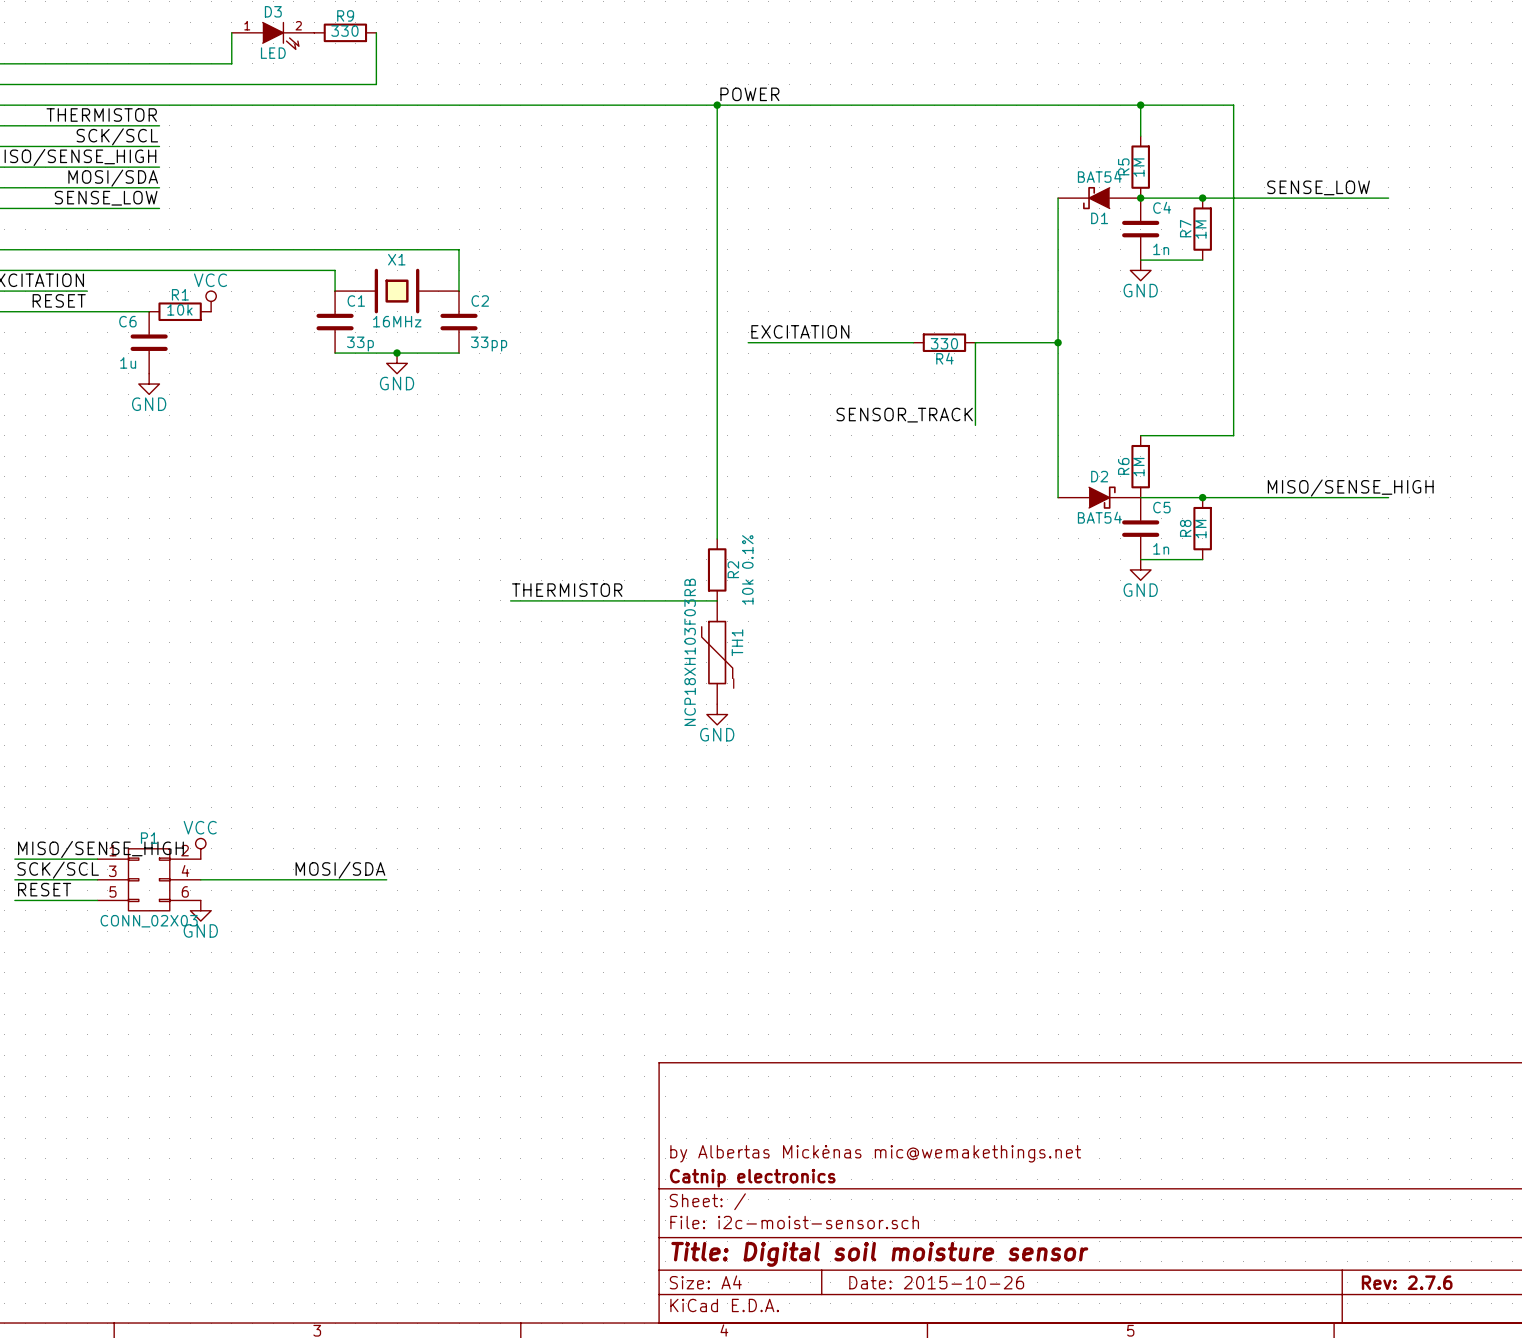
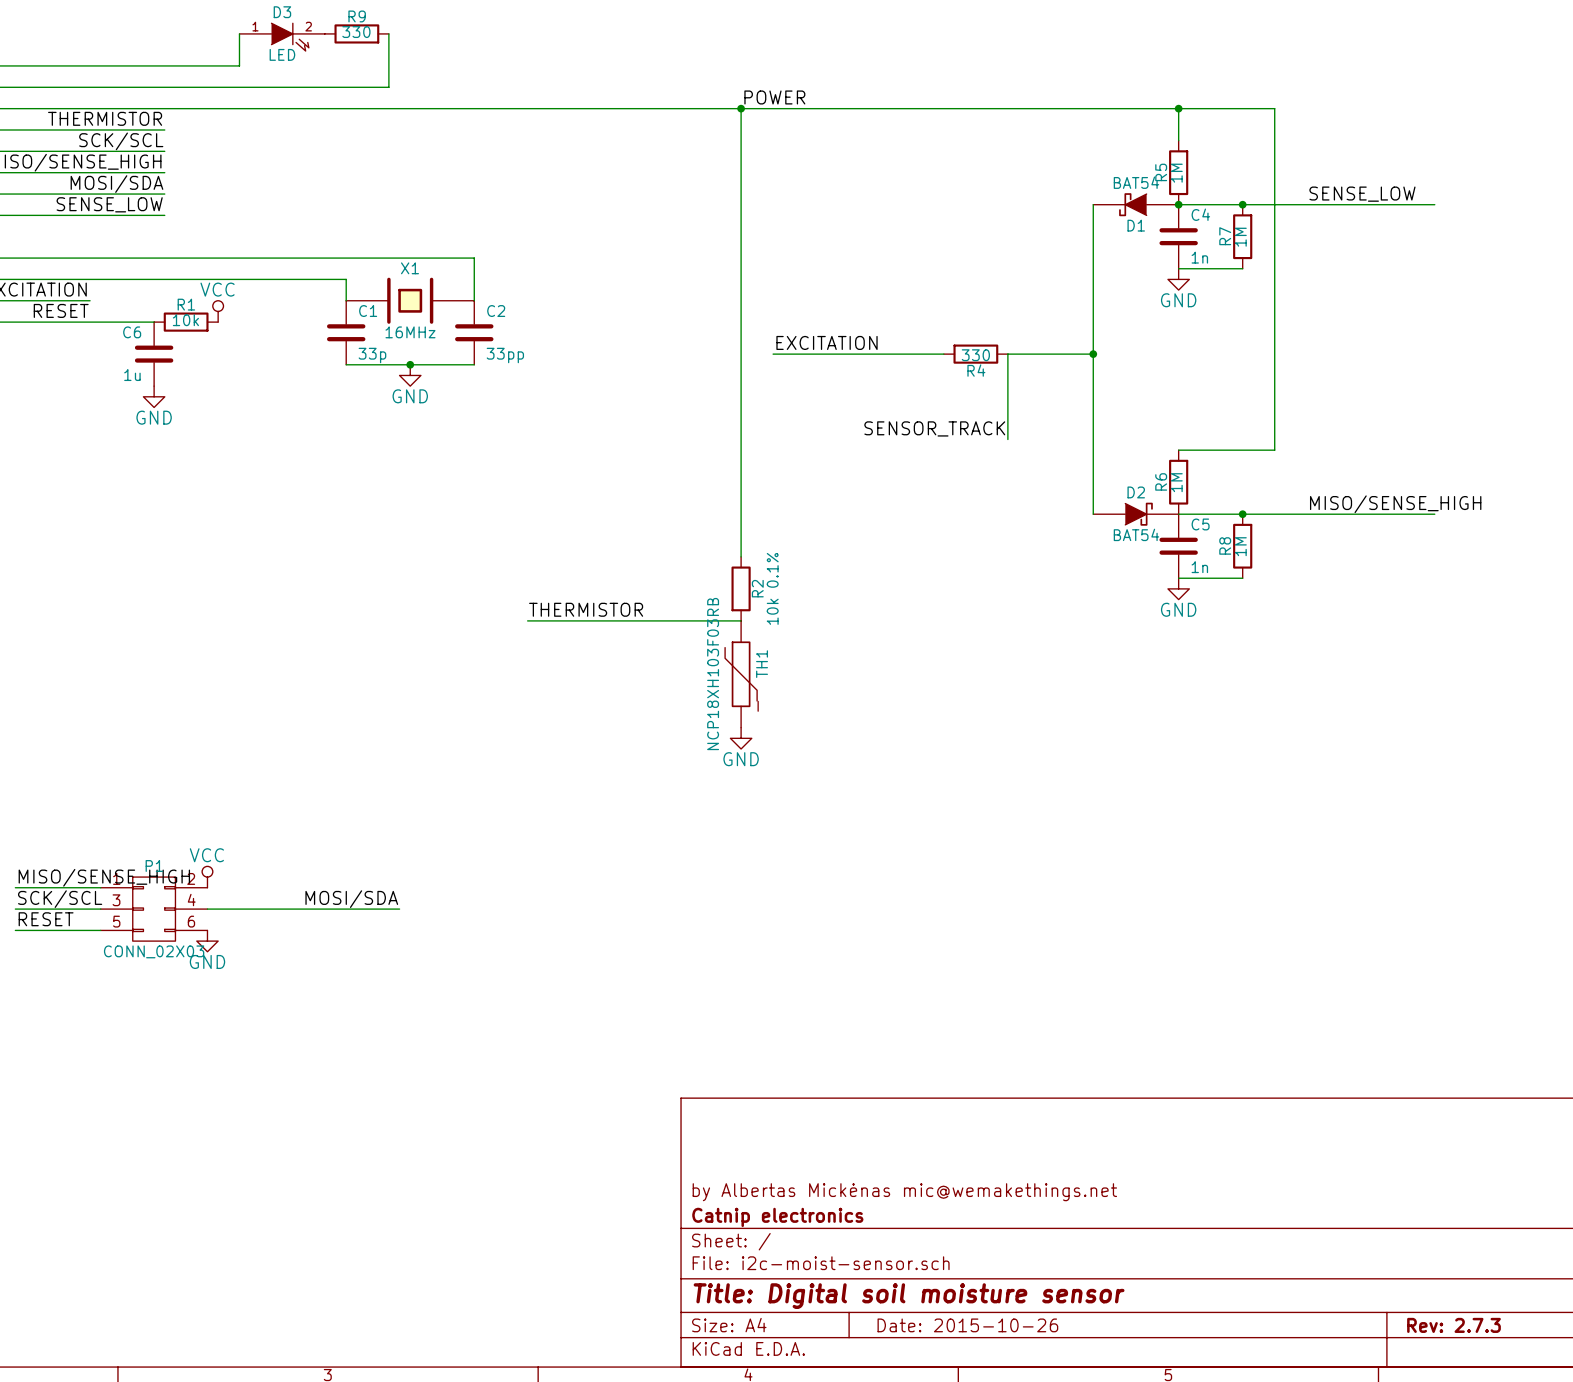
title block: Rev: 2.7.6 (1407, 1282) -> Rev: 2.7.3 (1454, 1325)

